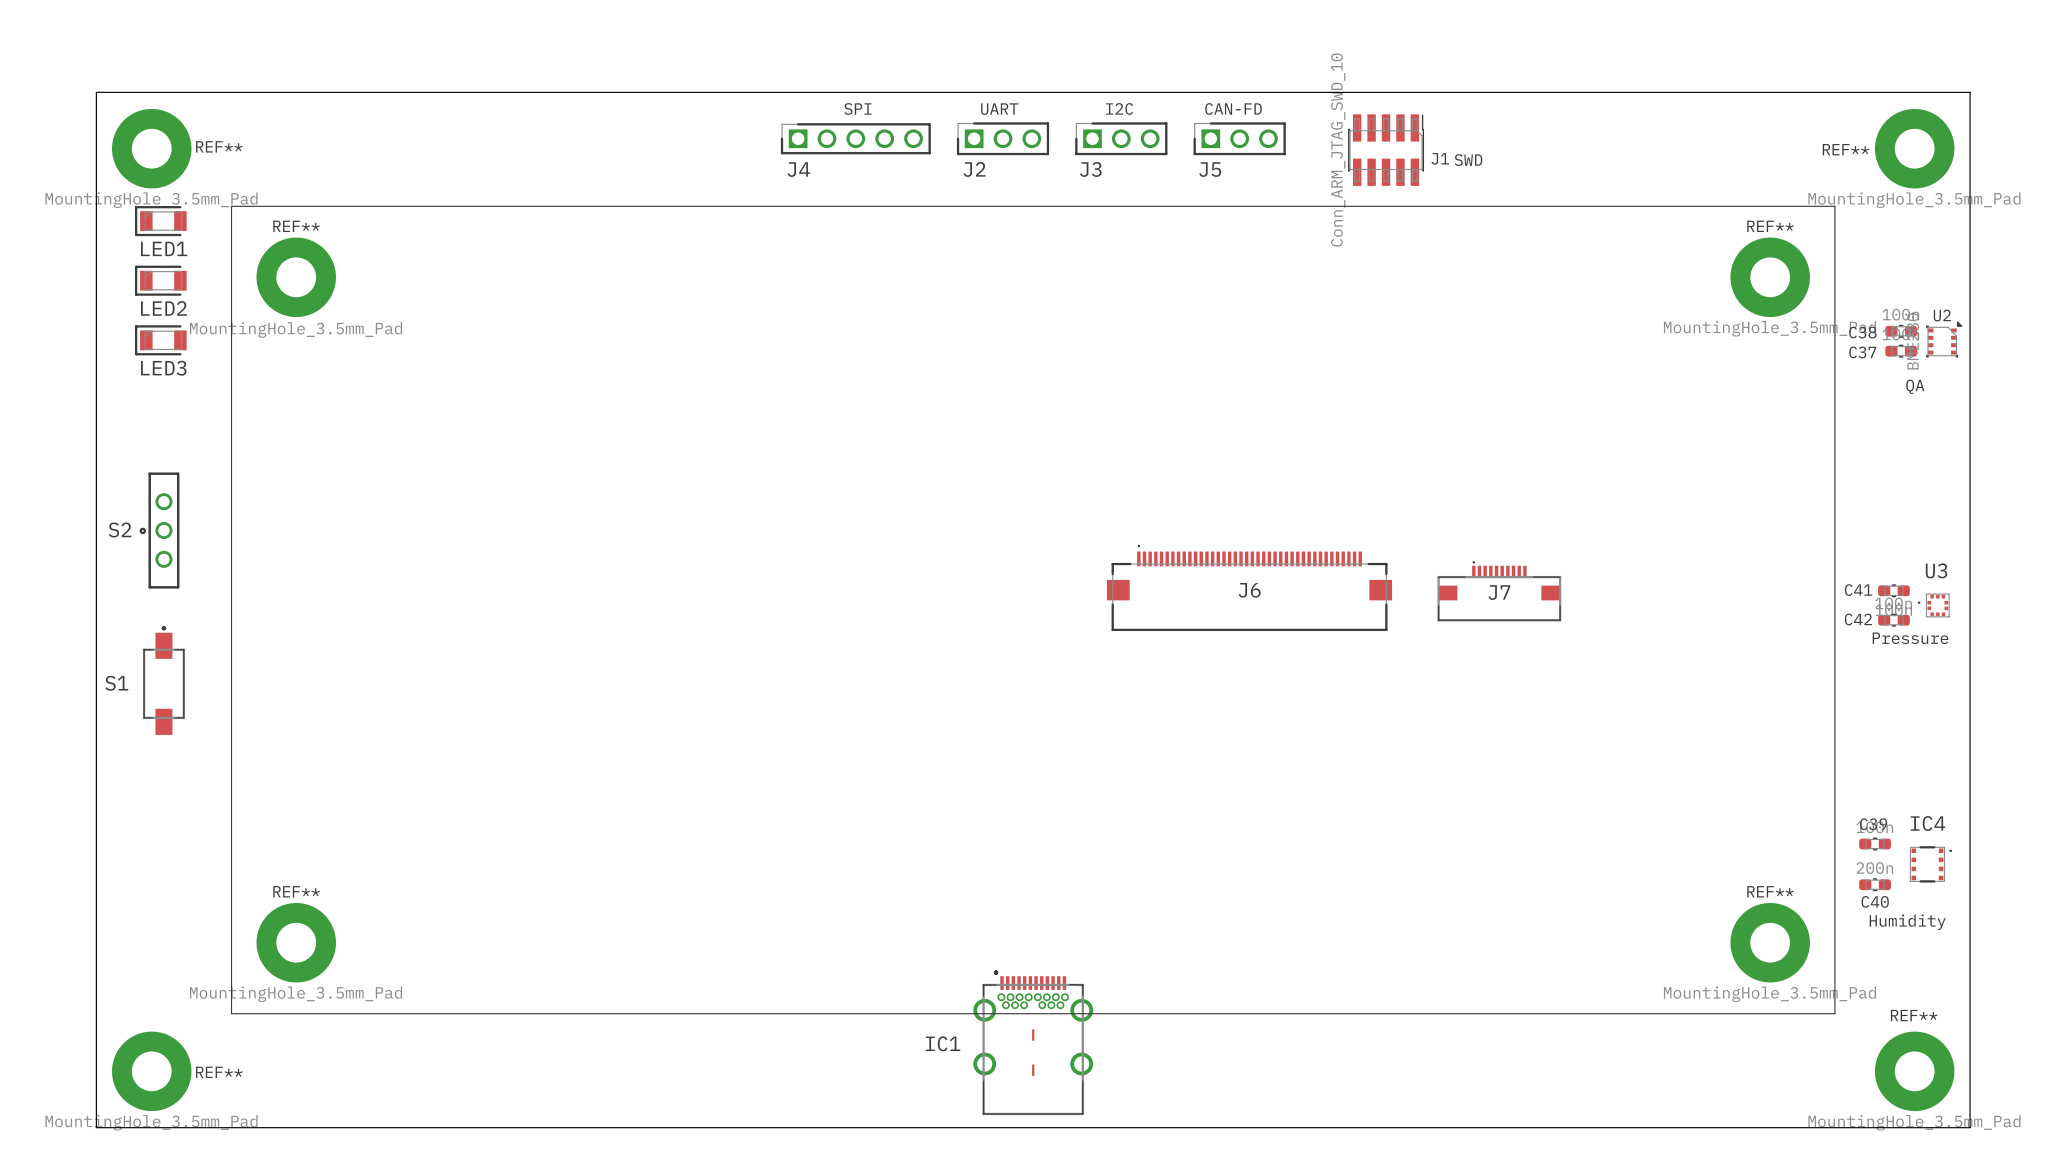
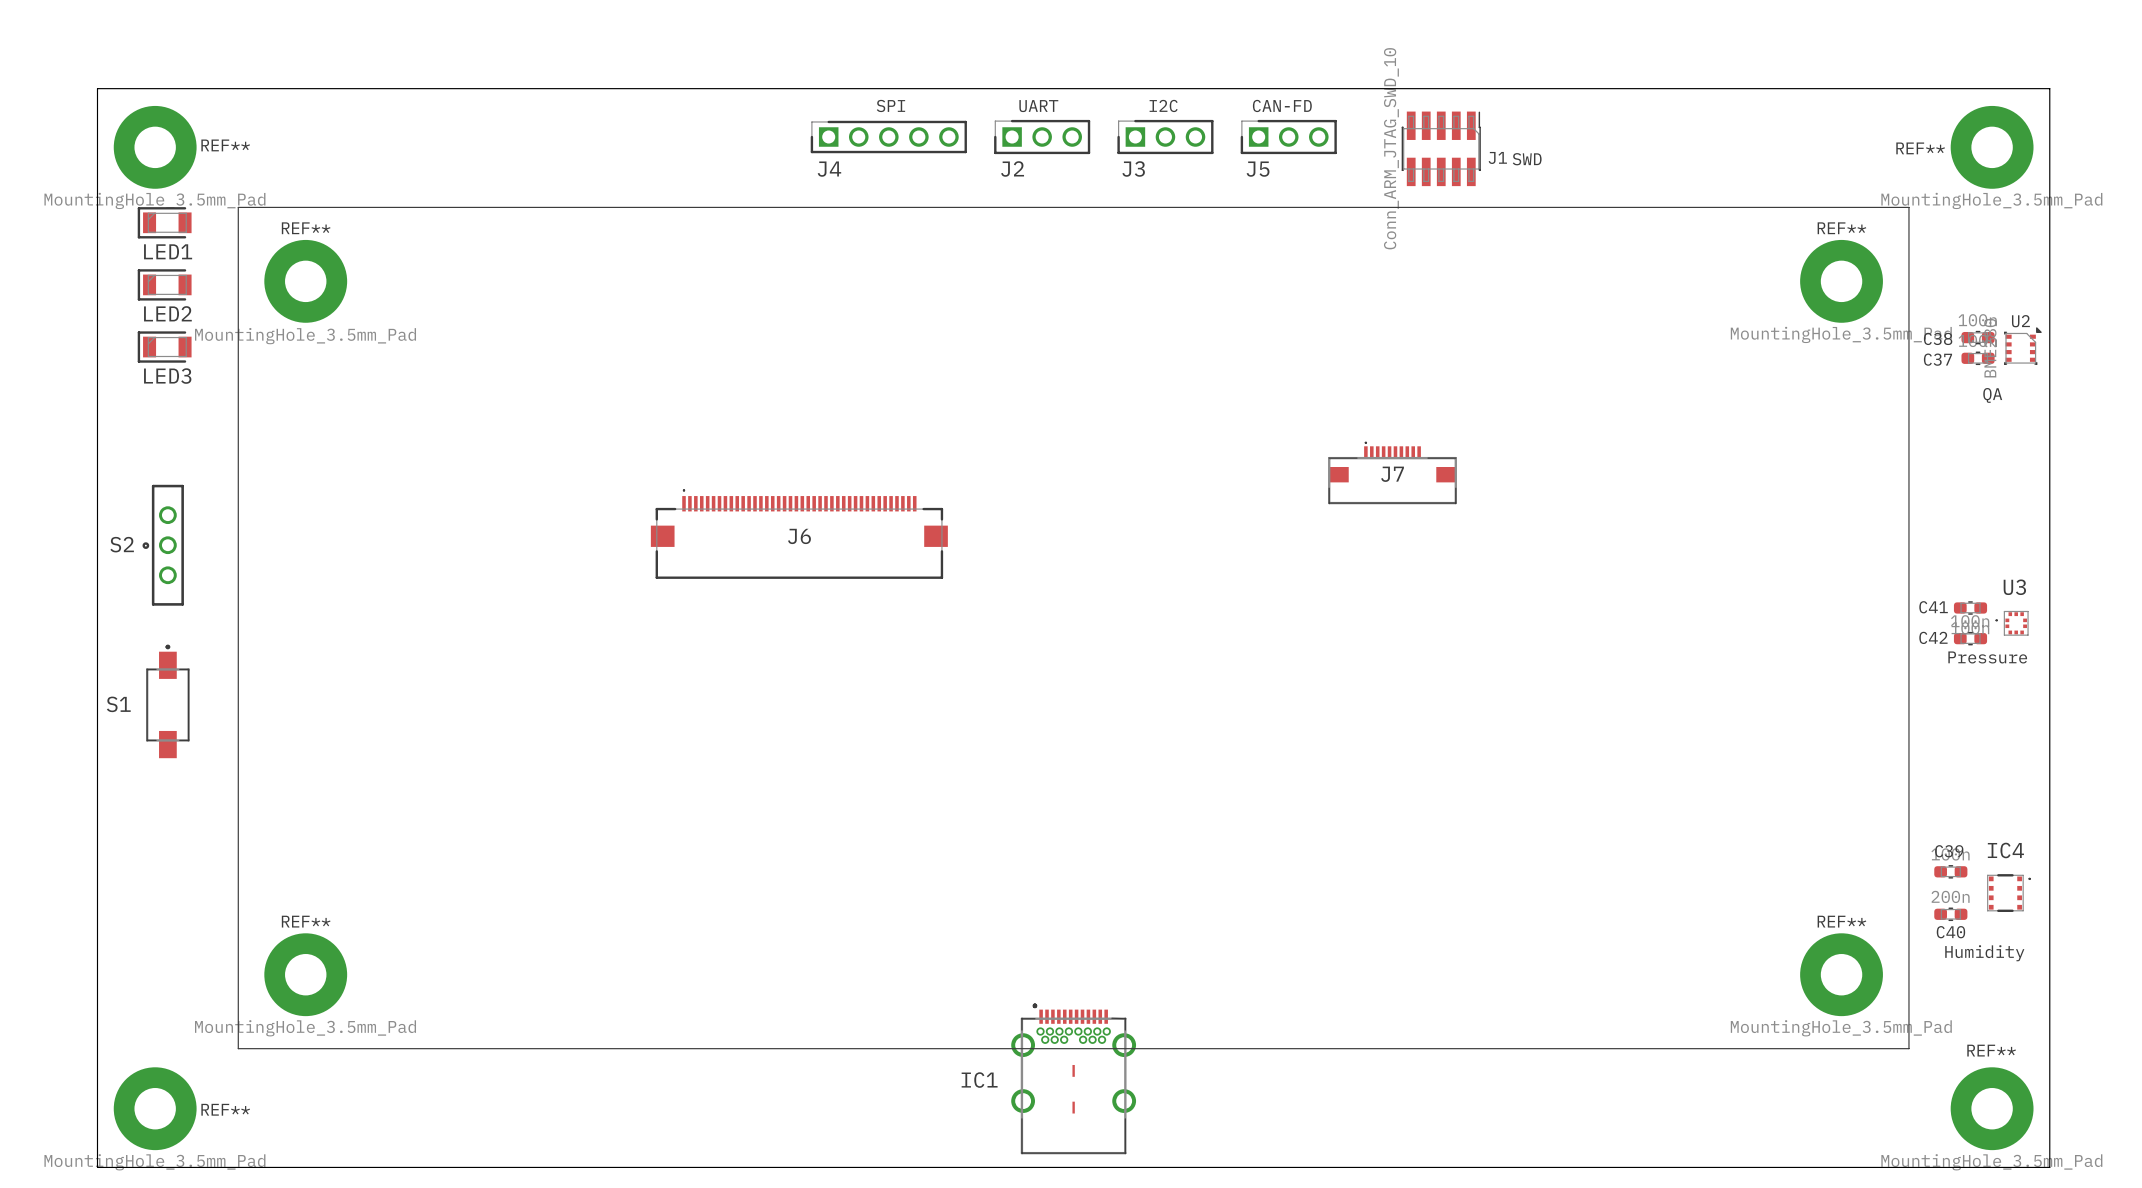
J6 position: (1249, 588) -> (799, 534)
J7 position: (1499, 591) -> (1392, 472)

